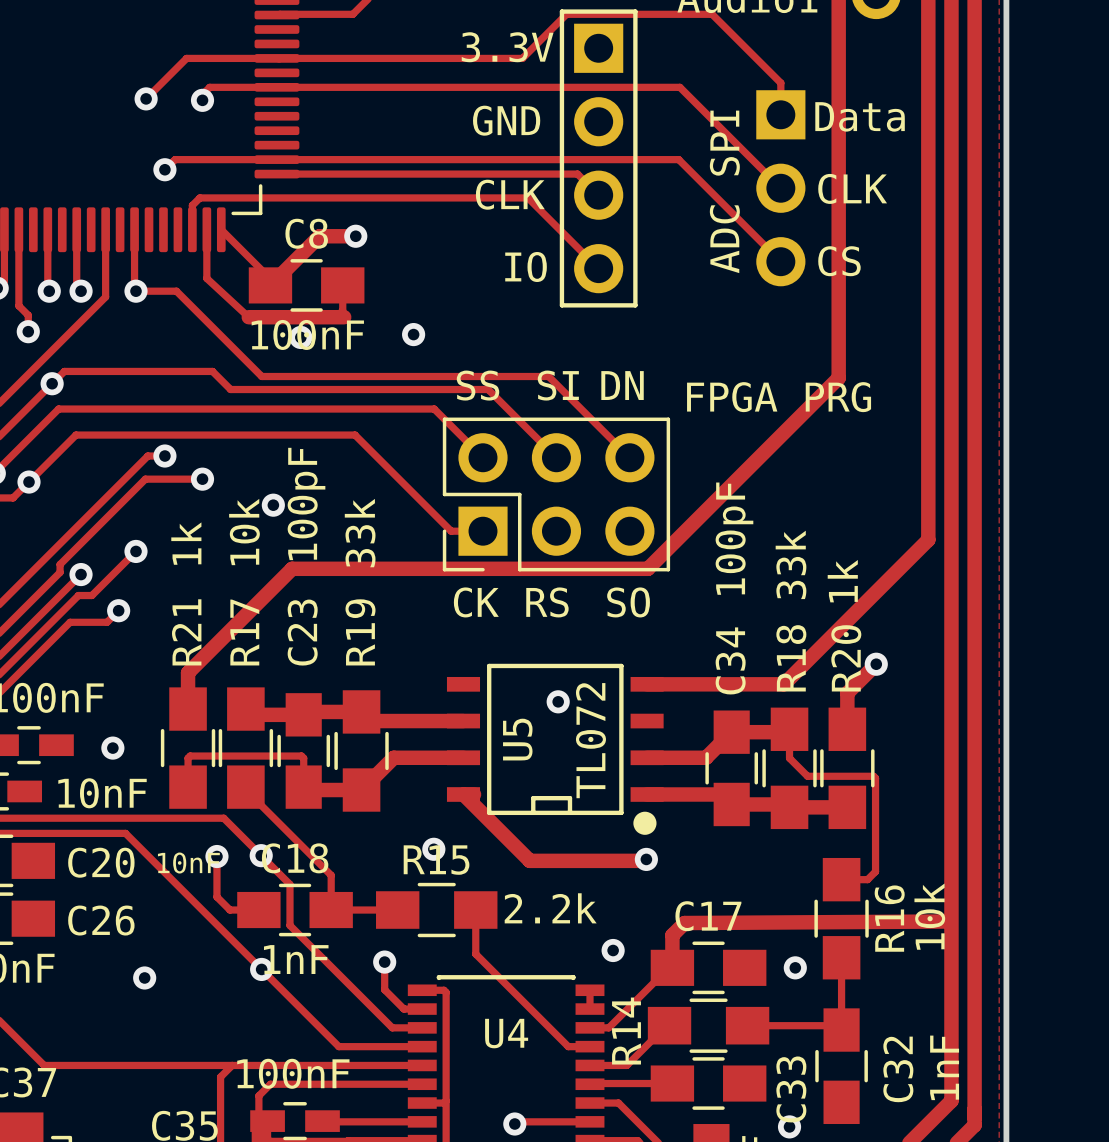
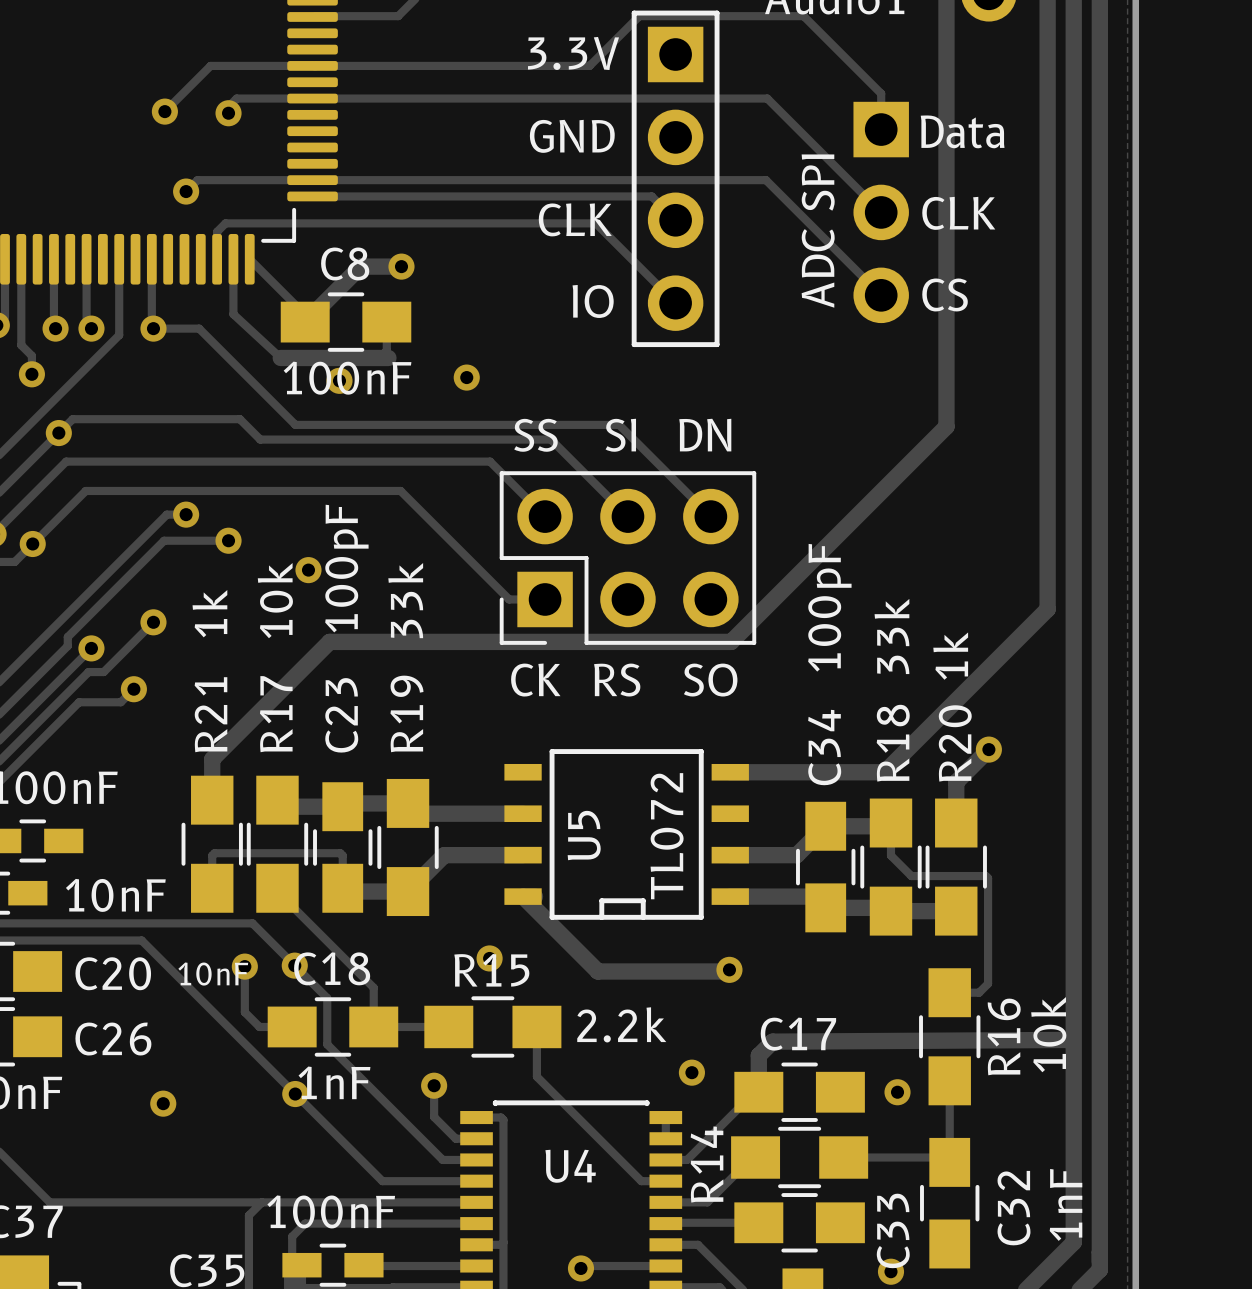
text: FPGA PRG (779, 397) -> none
via: (558, 701) -> none
via: (112, 748) -> none
drawing: [633, 811, 657, 835] -> none

